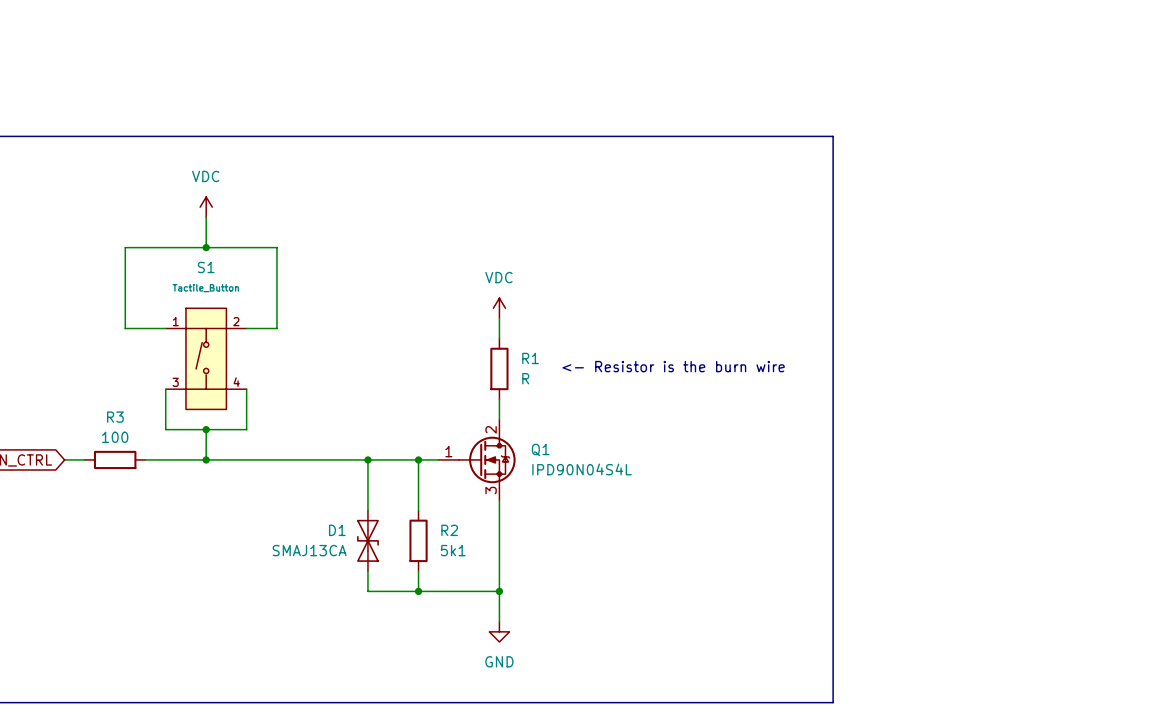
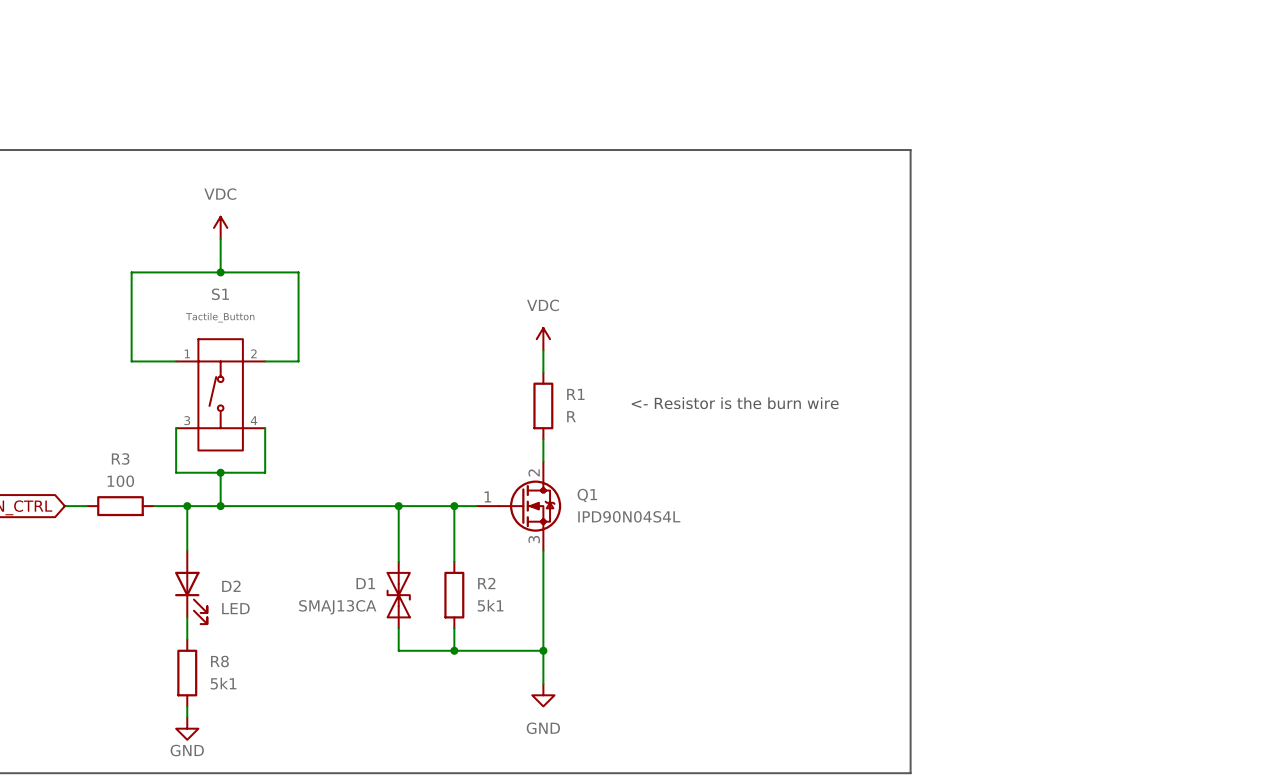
wire: none -> (187, 506) (187, 550)
junction: none -> (187, 506)
D2: none -> LED (191, 587)
wire: none -> (187, 617) (187, 639)
R8: none -> 5k1 (187, 673)
wire: none -> (187, 706) (187, 717)
power symbol: none -> GND (187, 728)

